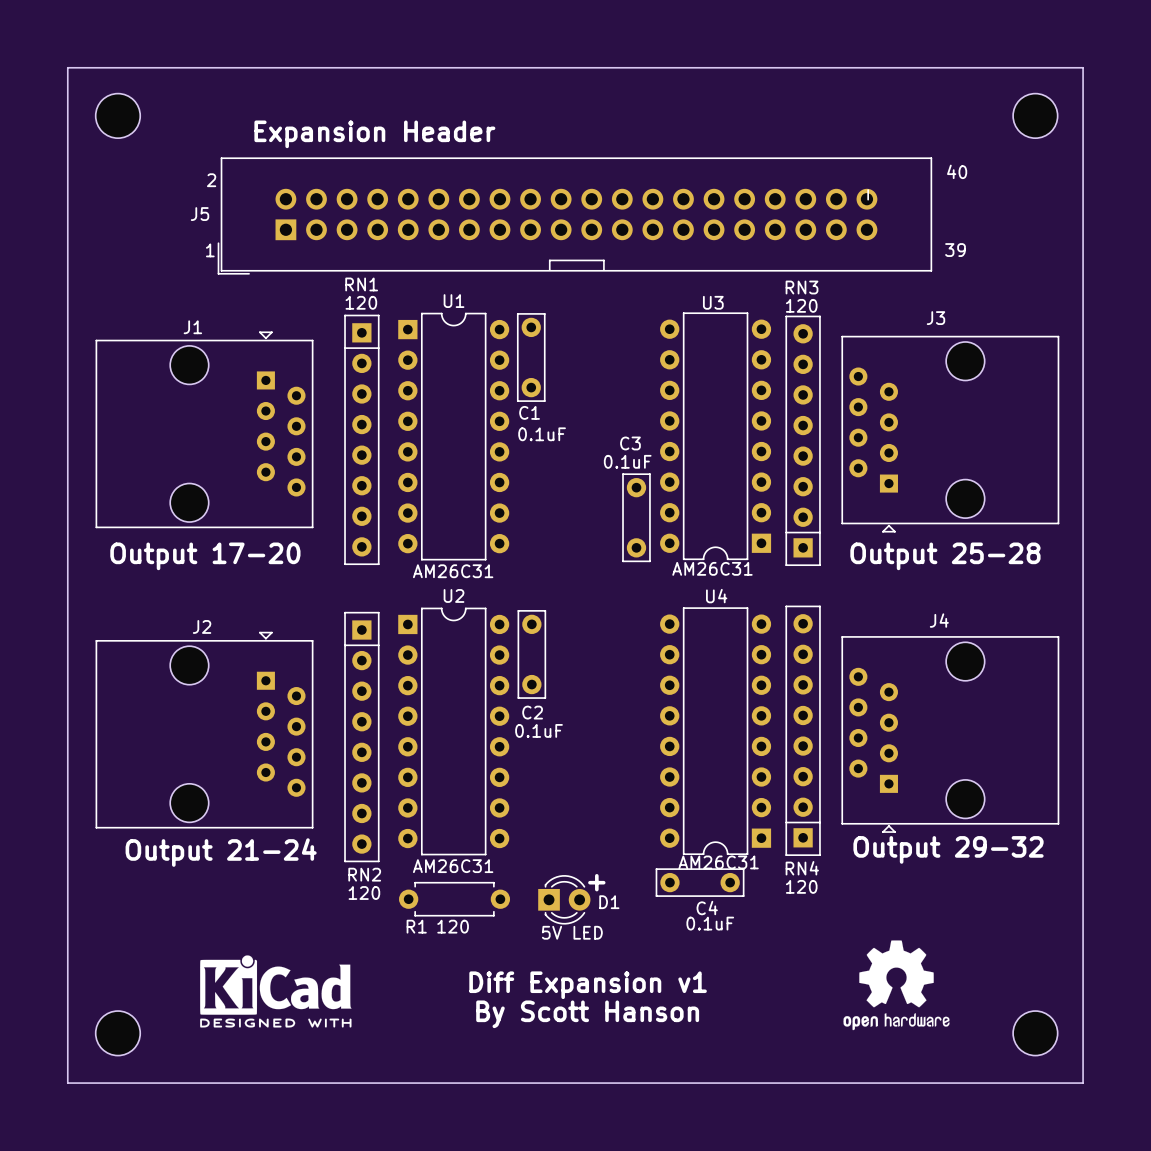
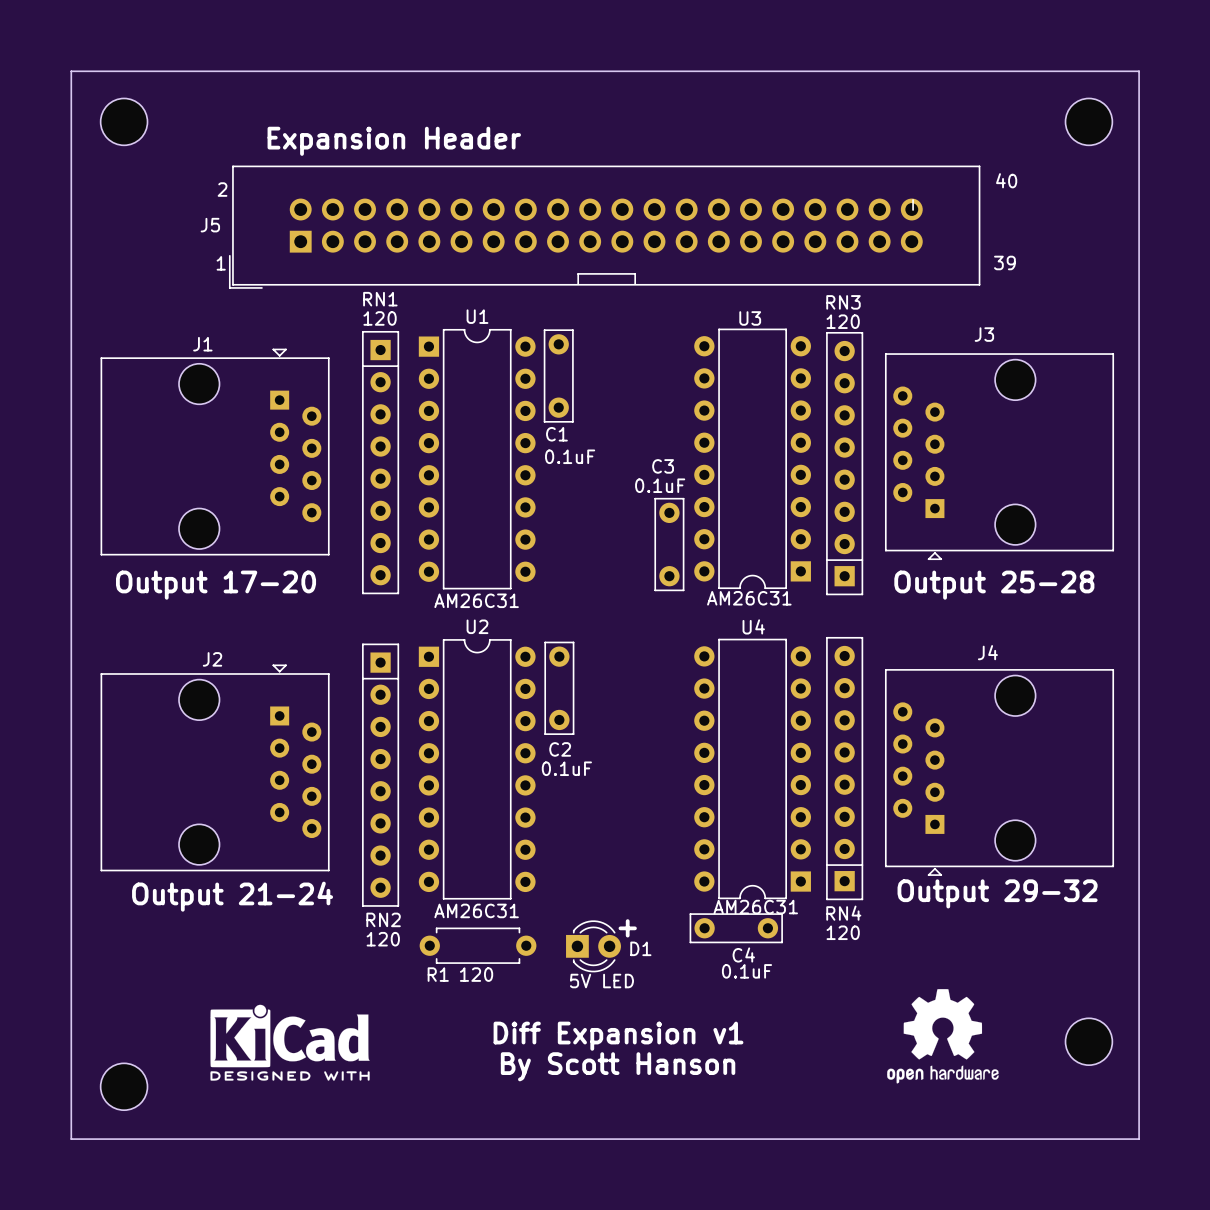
part position: (1035, 1033) -> (1088, 1041)

